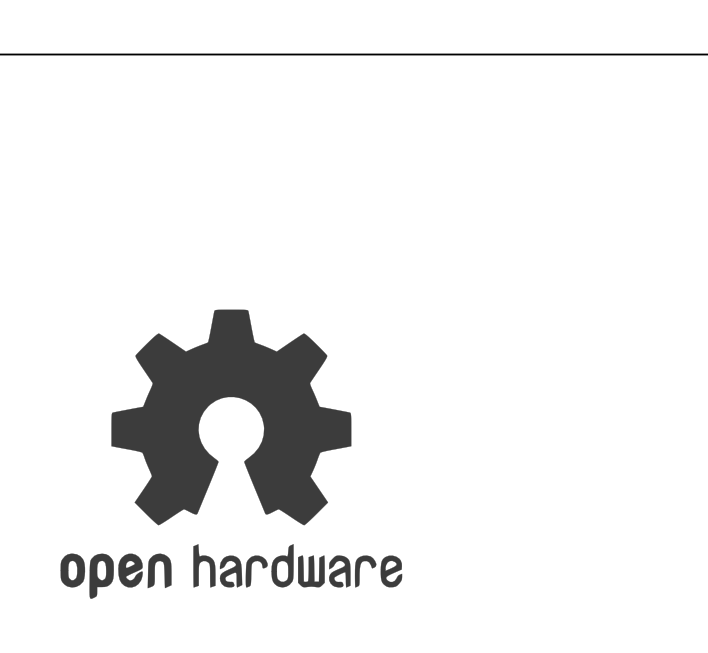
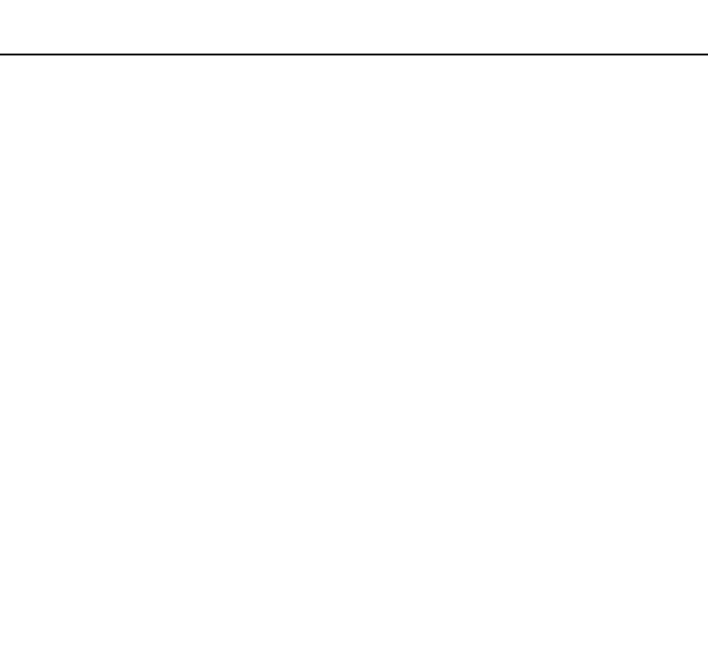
drawing: [60, 309, 403, 599] -> none

